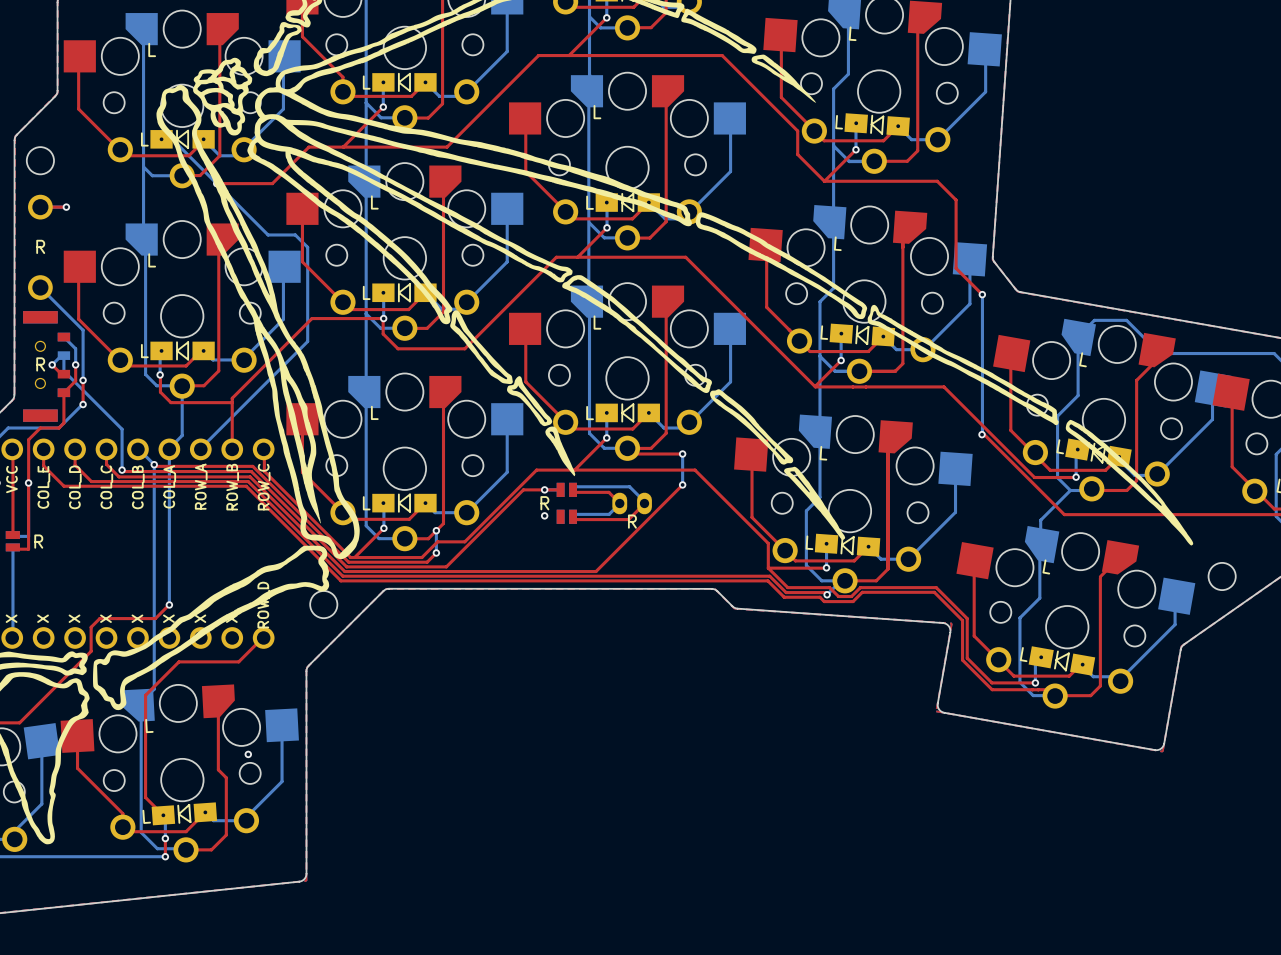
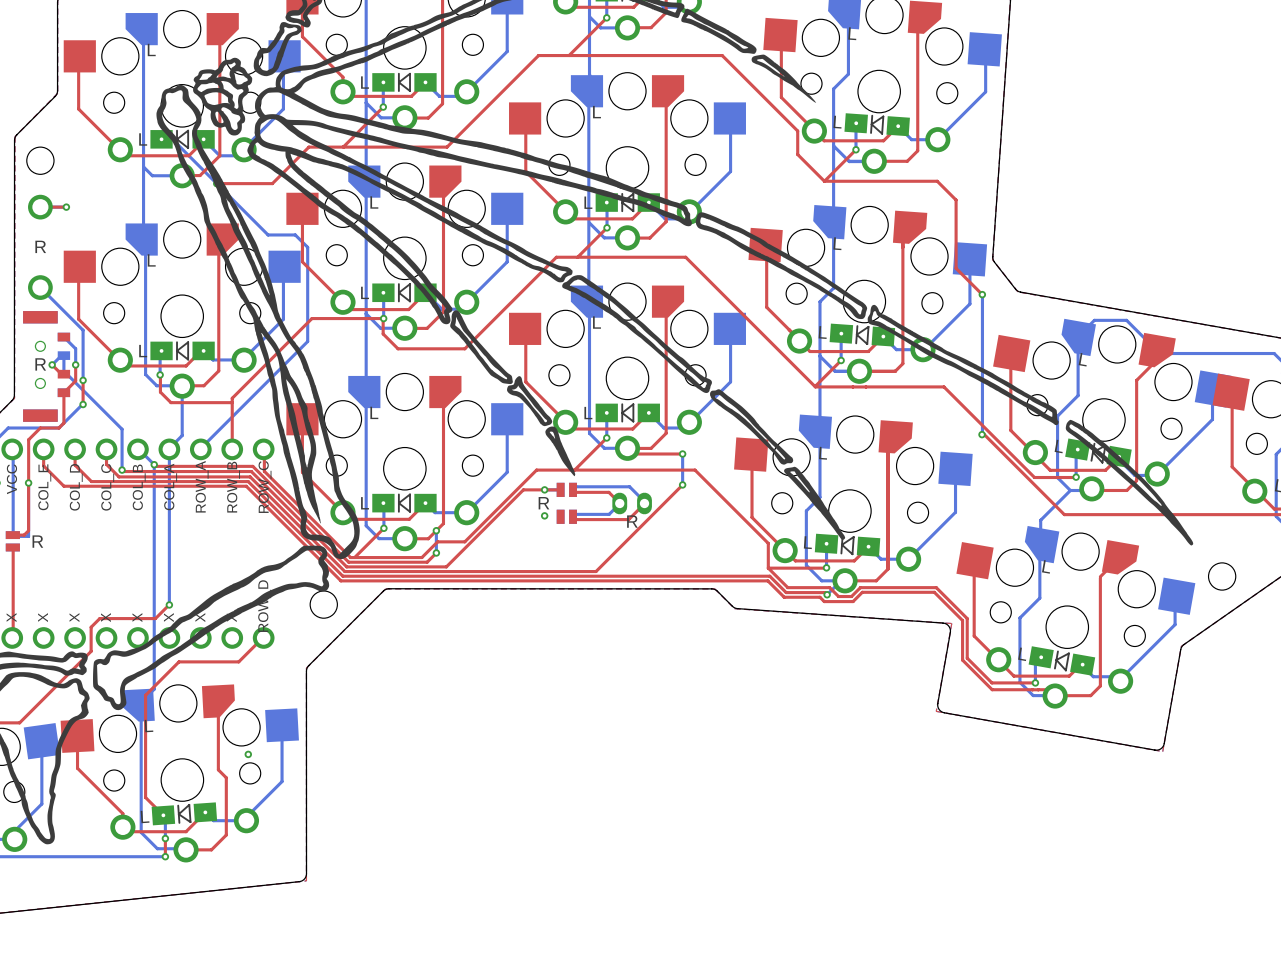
top track: (12, 448) (12, 534) -> none
bottom track: none -> (12, 449) (12, 535)
top track: (28, 530) (28, 549) (14, 549) -> (28, 530) (24, 535) (12, 535)
top track: none -> (12, 547) (12, 637)
bottom track: (12, 547) (12, 636) -> none

